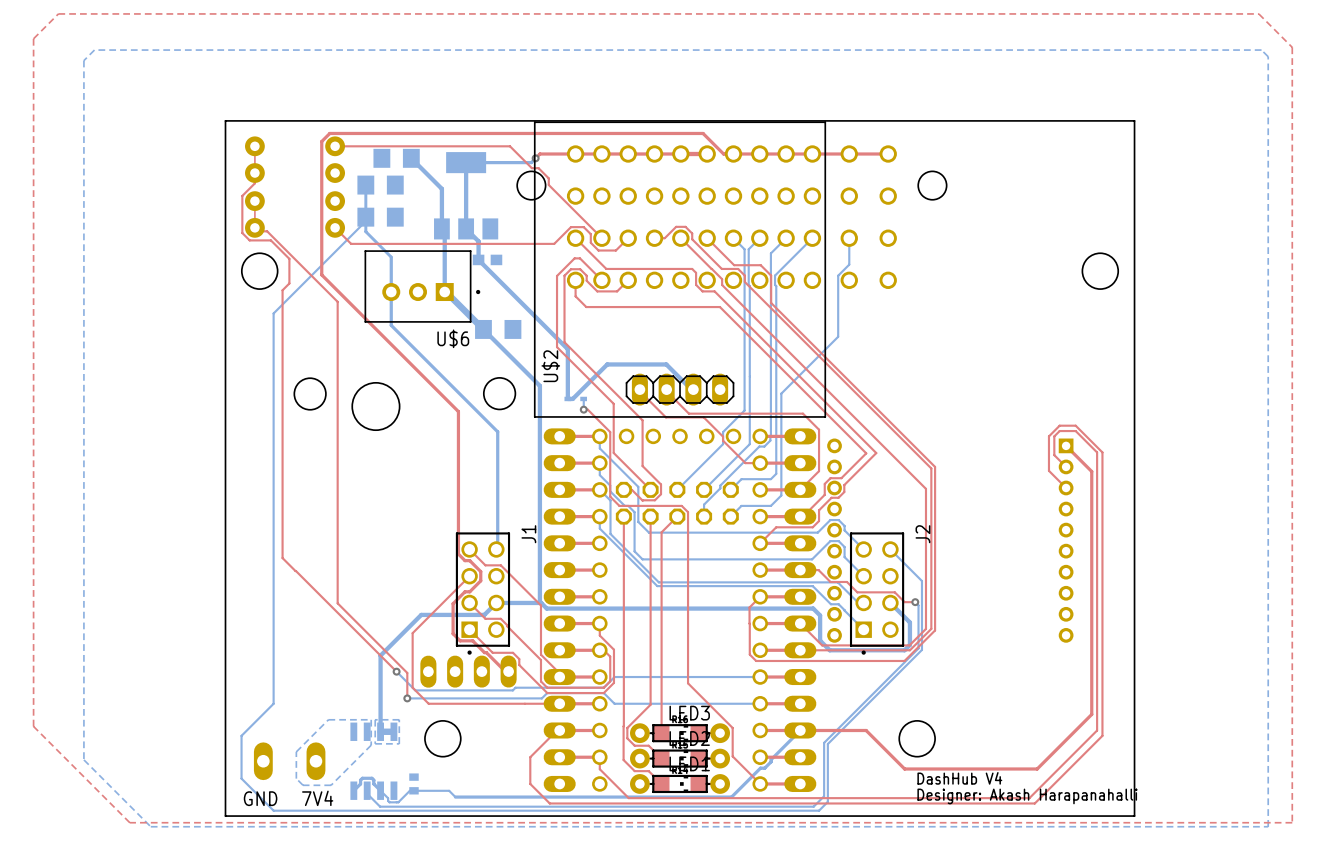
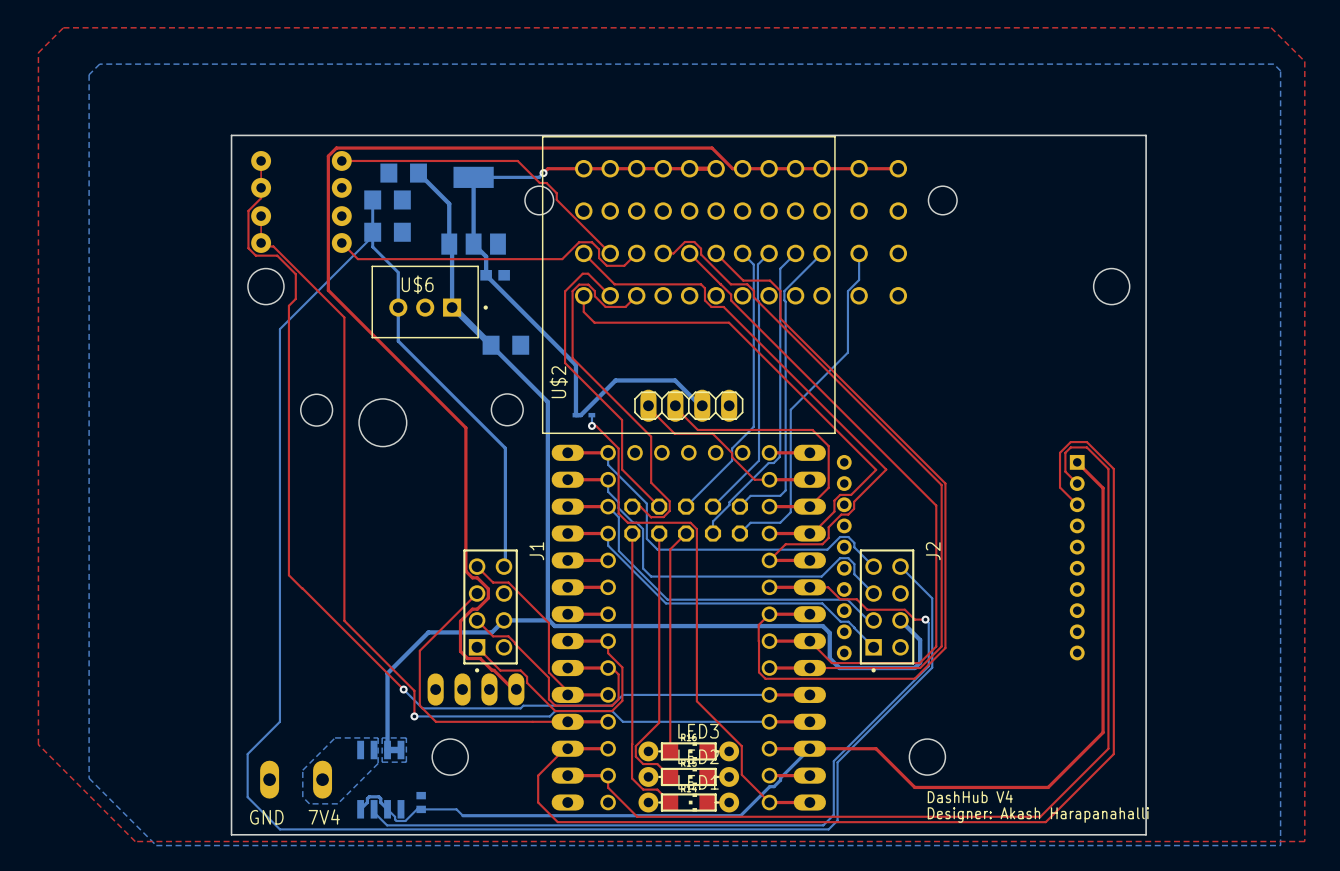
U$6 name position: U$6 (453, 338) -> U$6 (417, 284)

